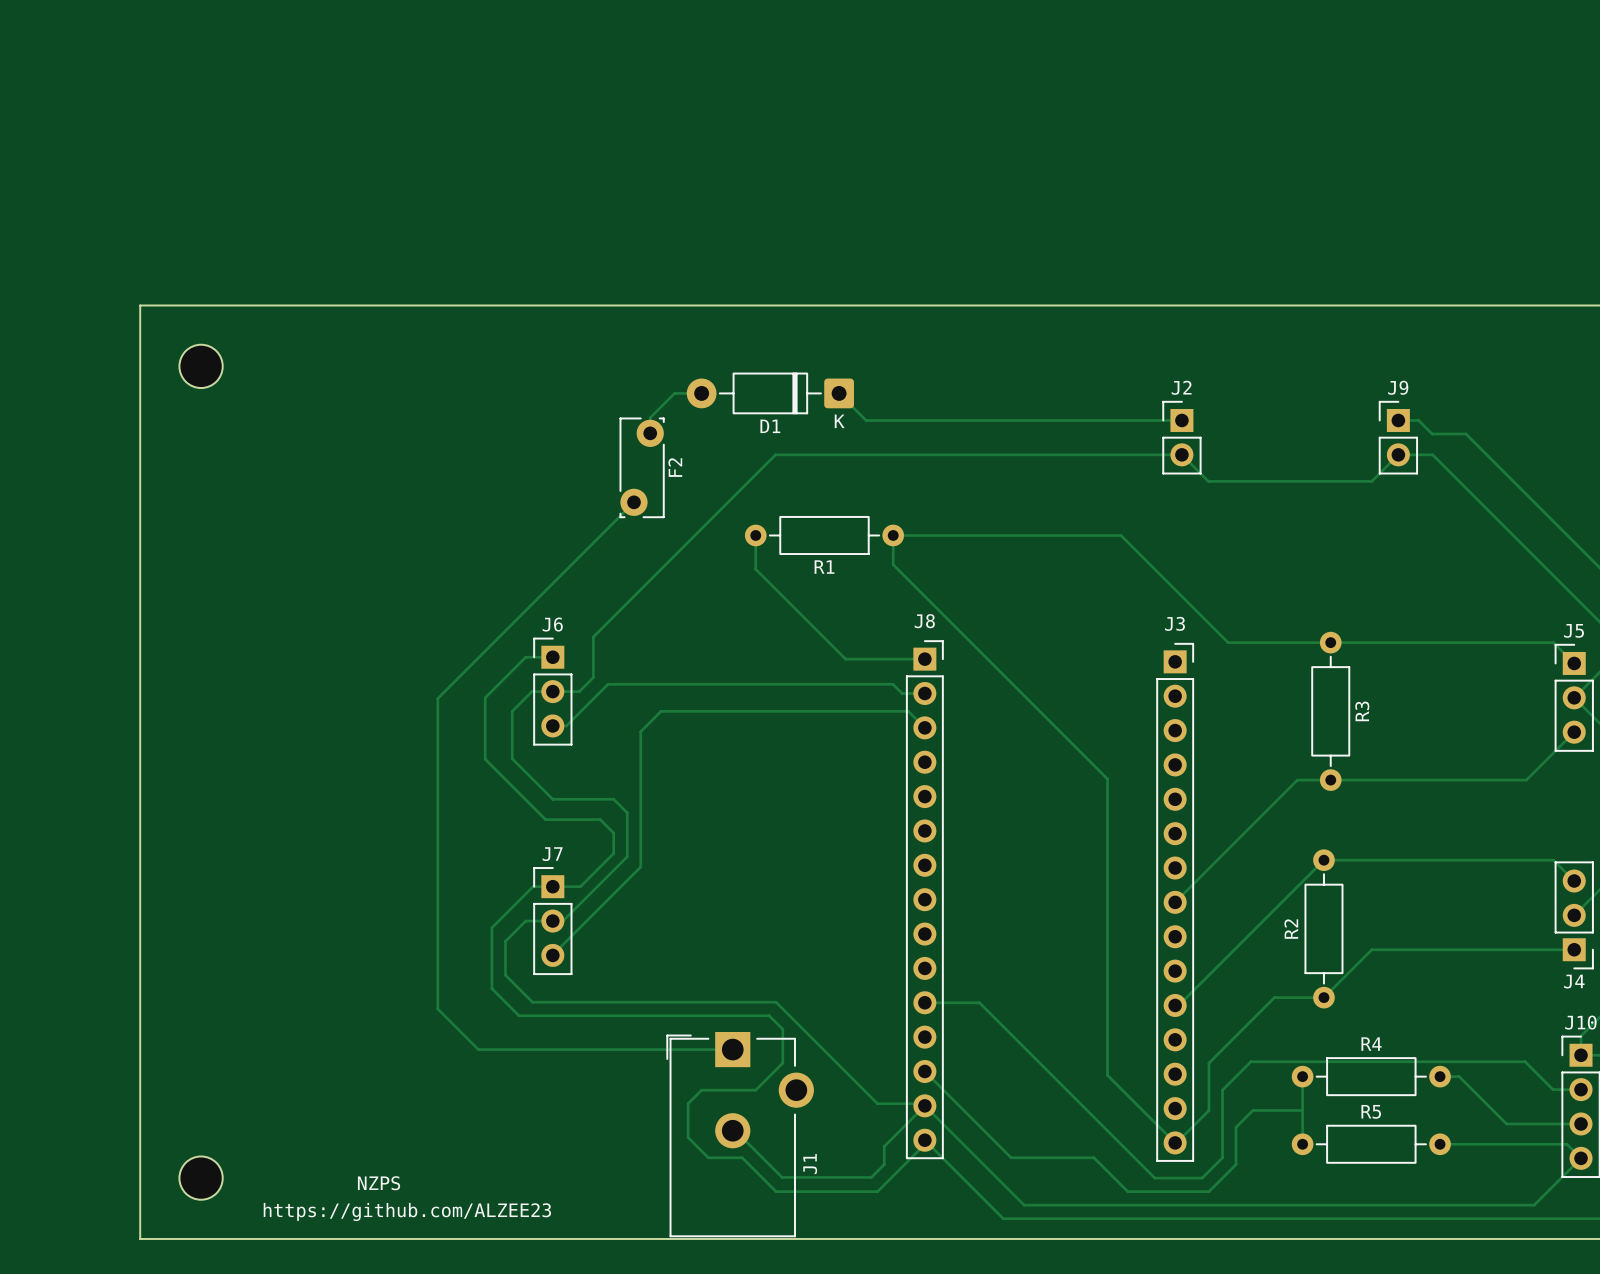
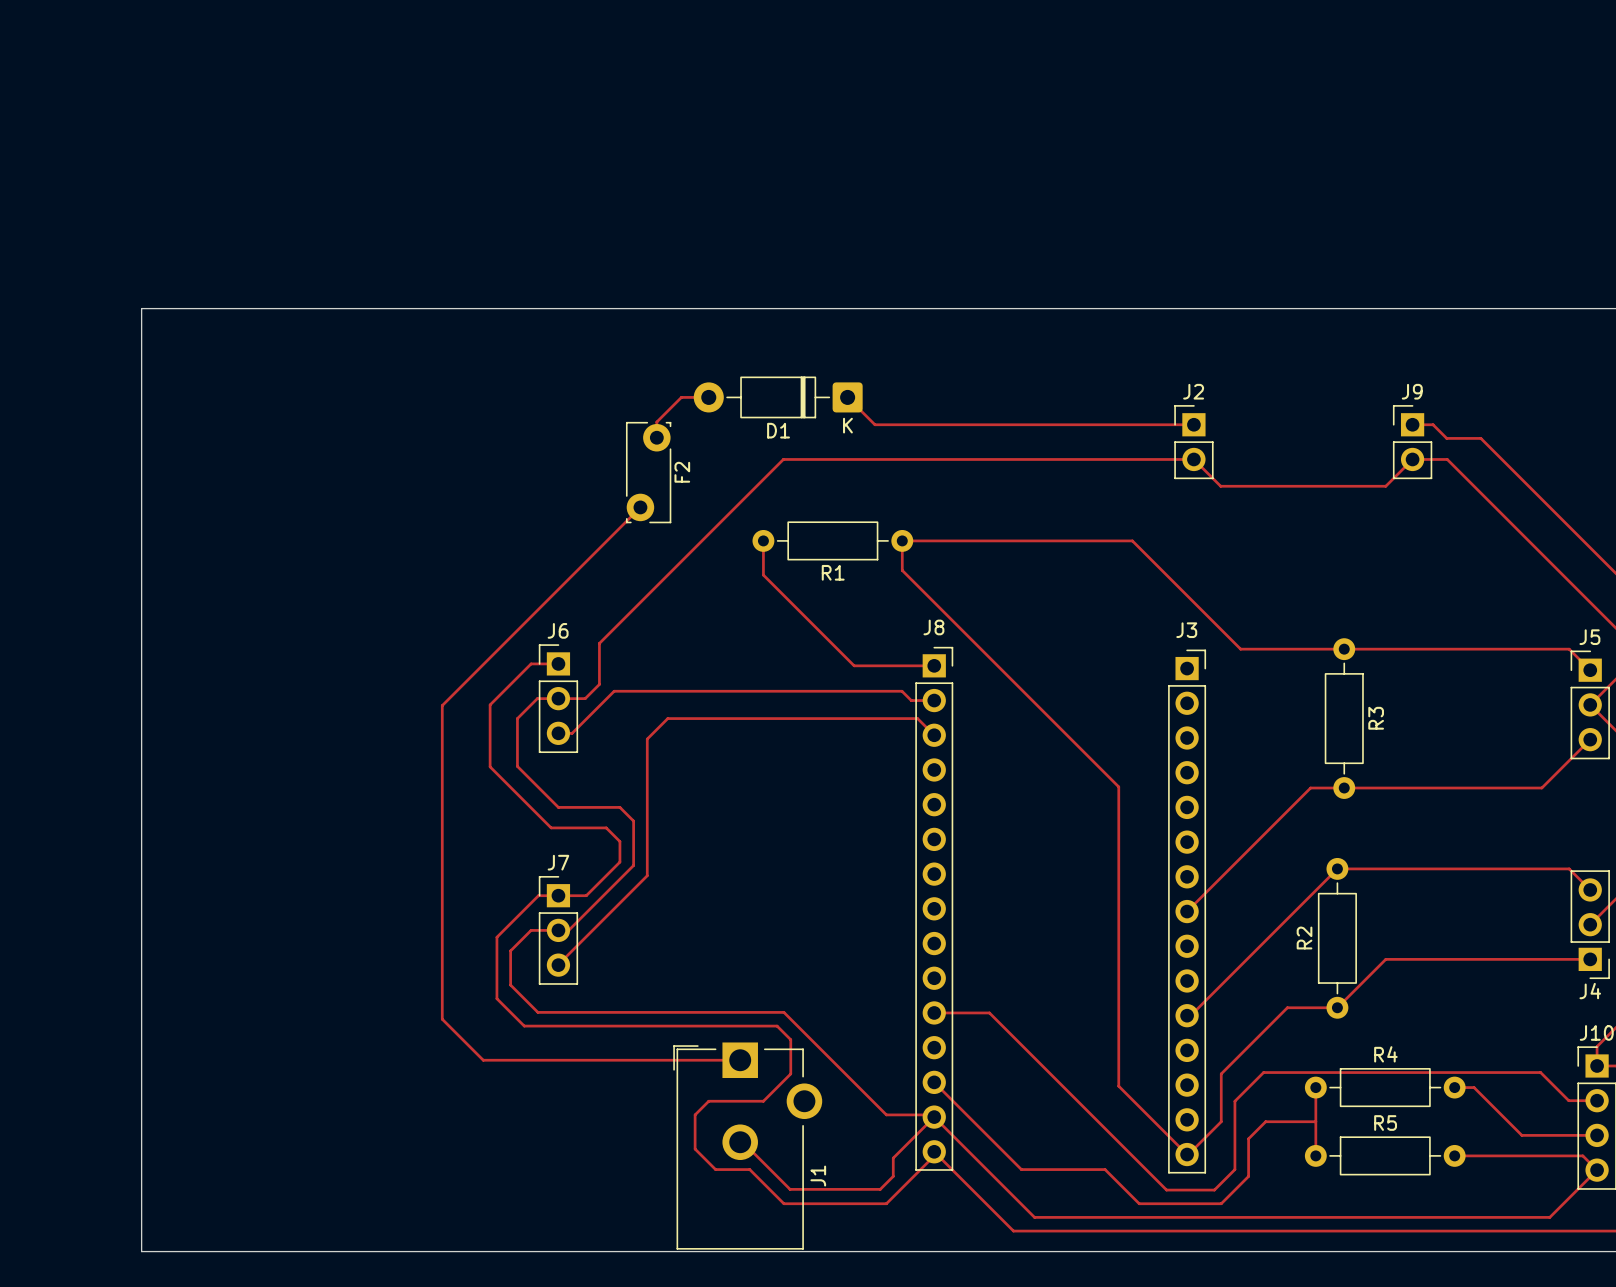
part: (201, 366) -> none
part: (201, 1178) -> none
text: NZPS (379, 1183) -> none
text: https://github.com/ALZEE23 (407, 1211) -> none

